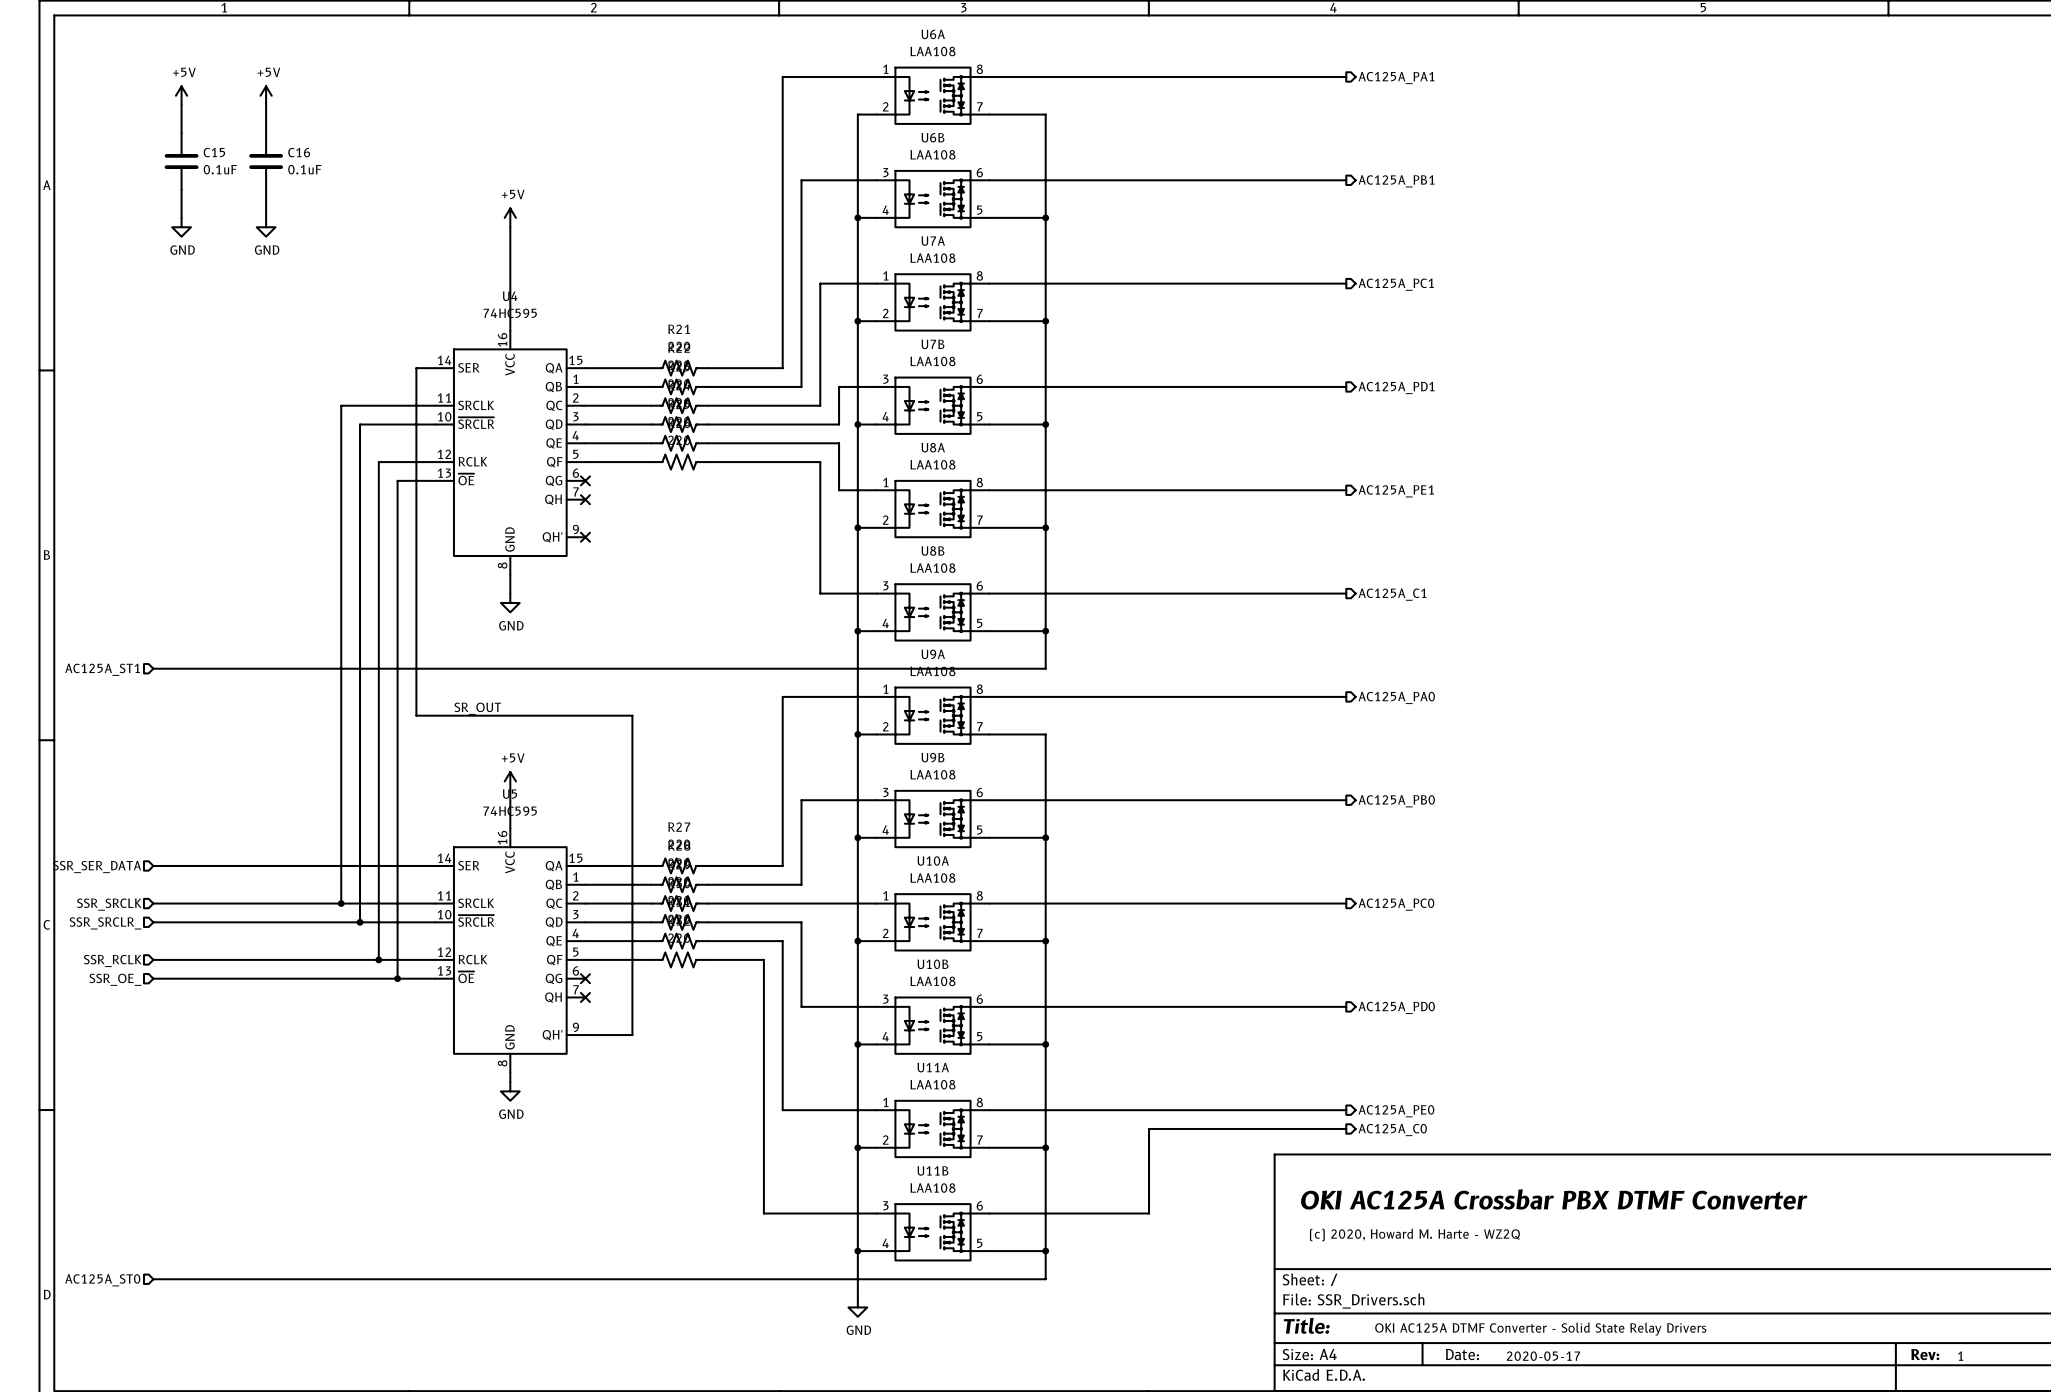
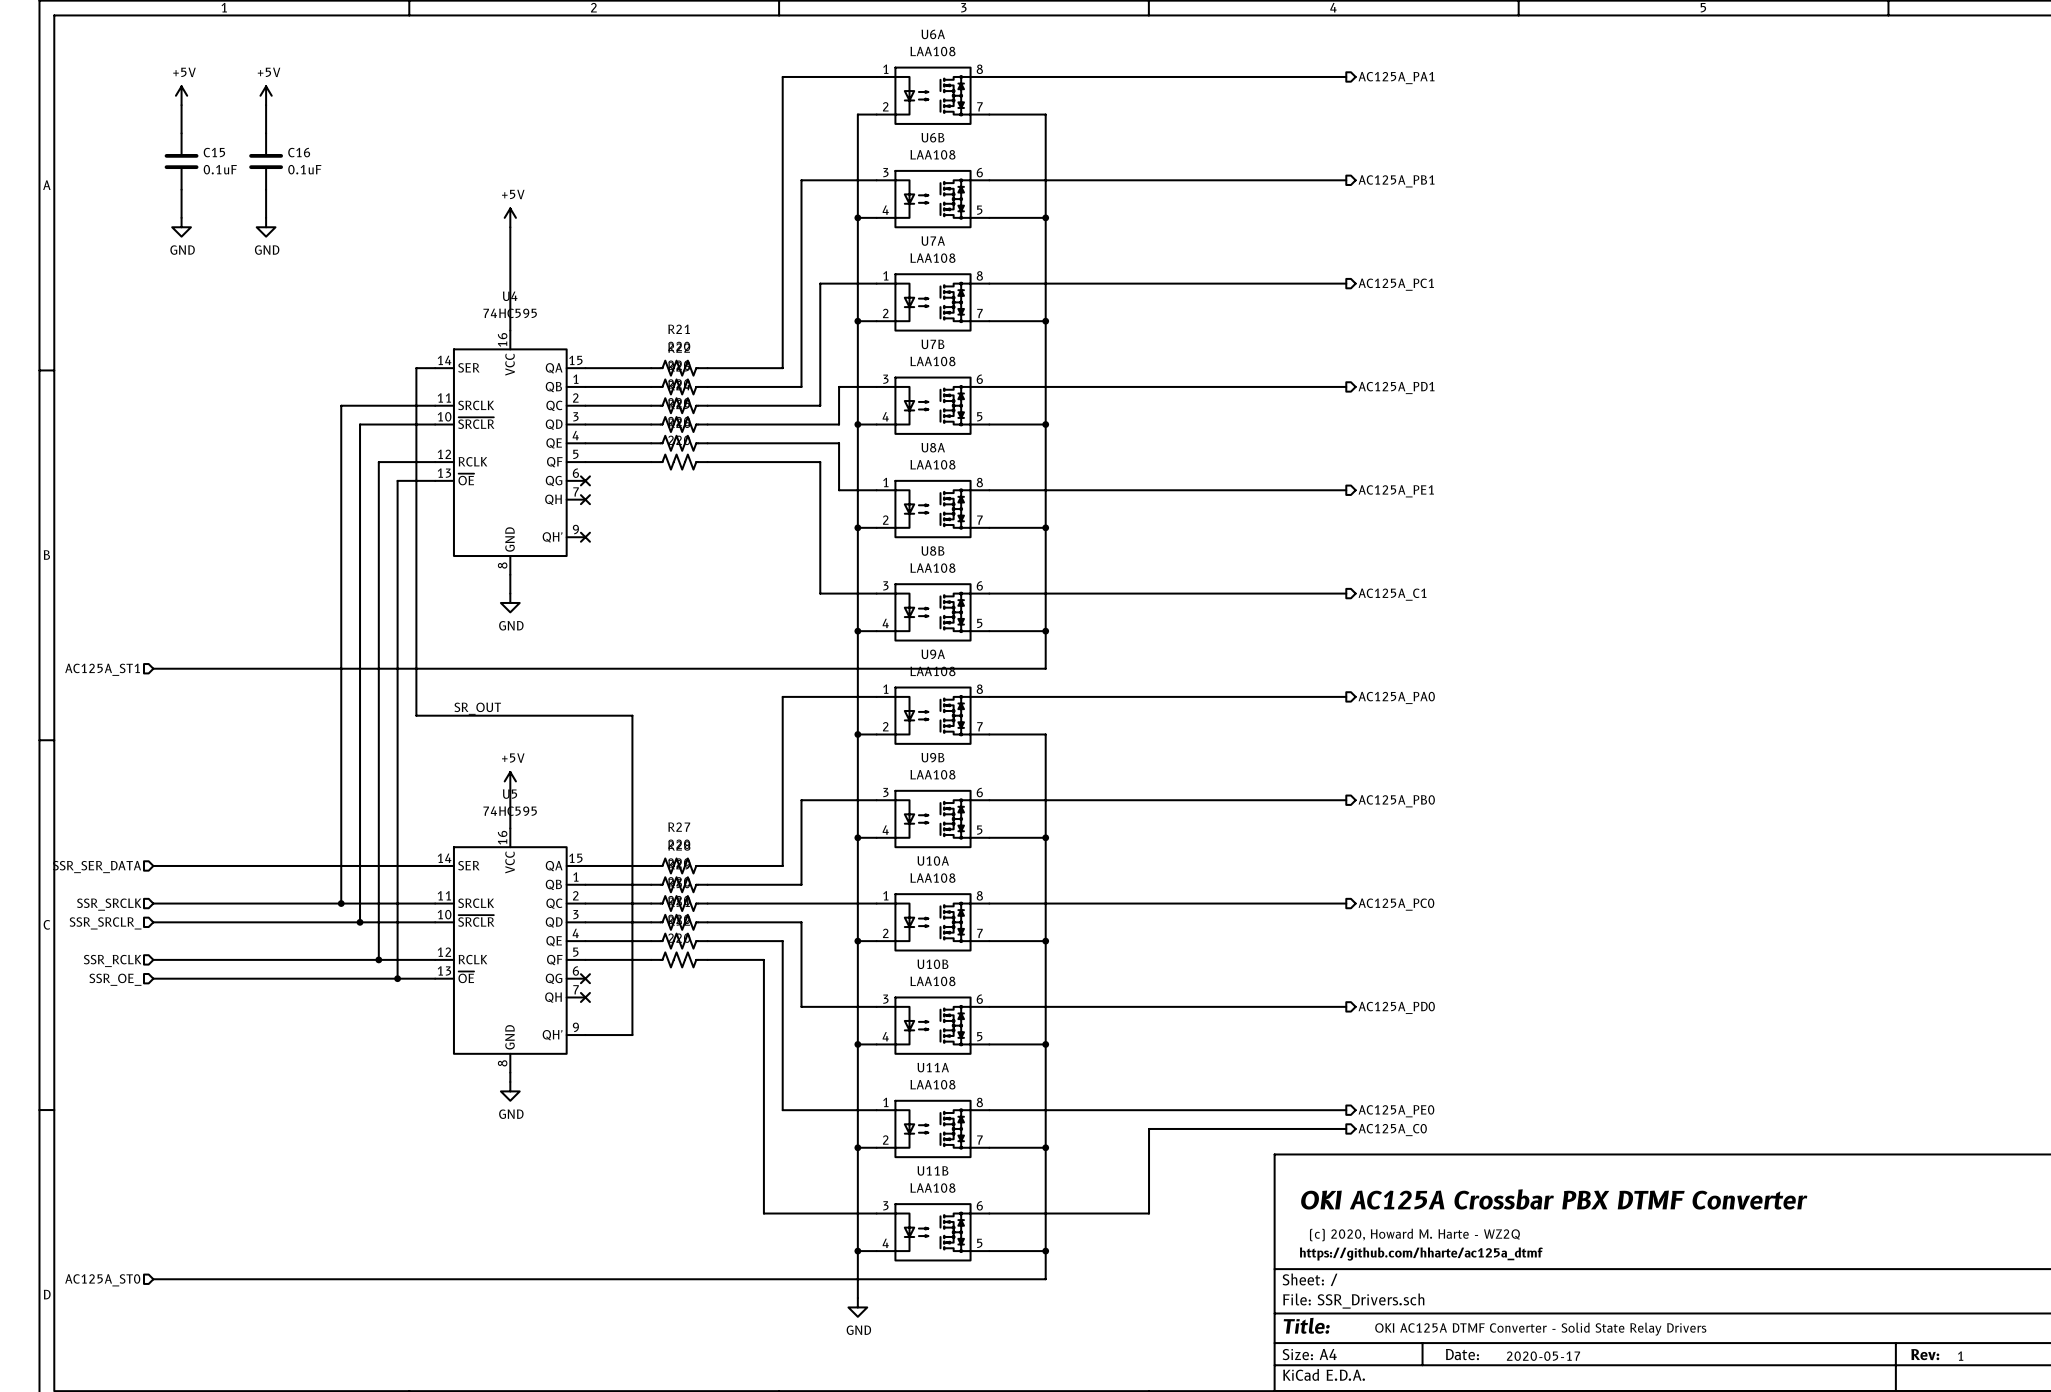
text: none -> https://github.com/hharte/ac125a_dtmf (1421, 1254)

